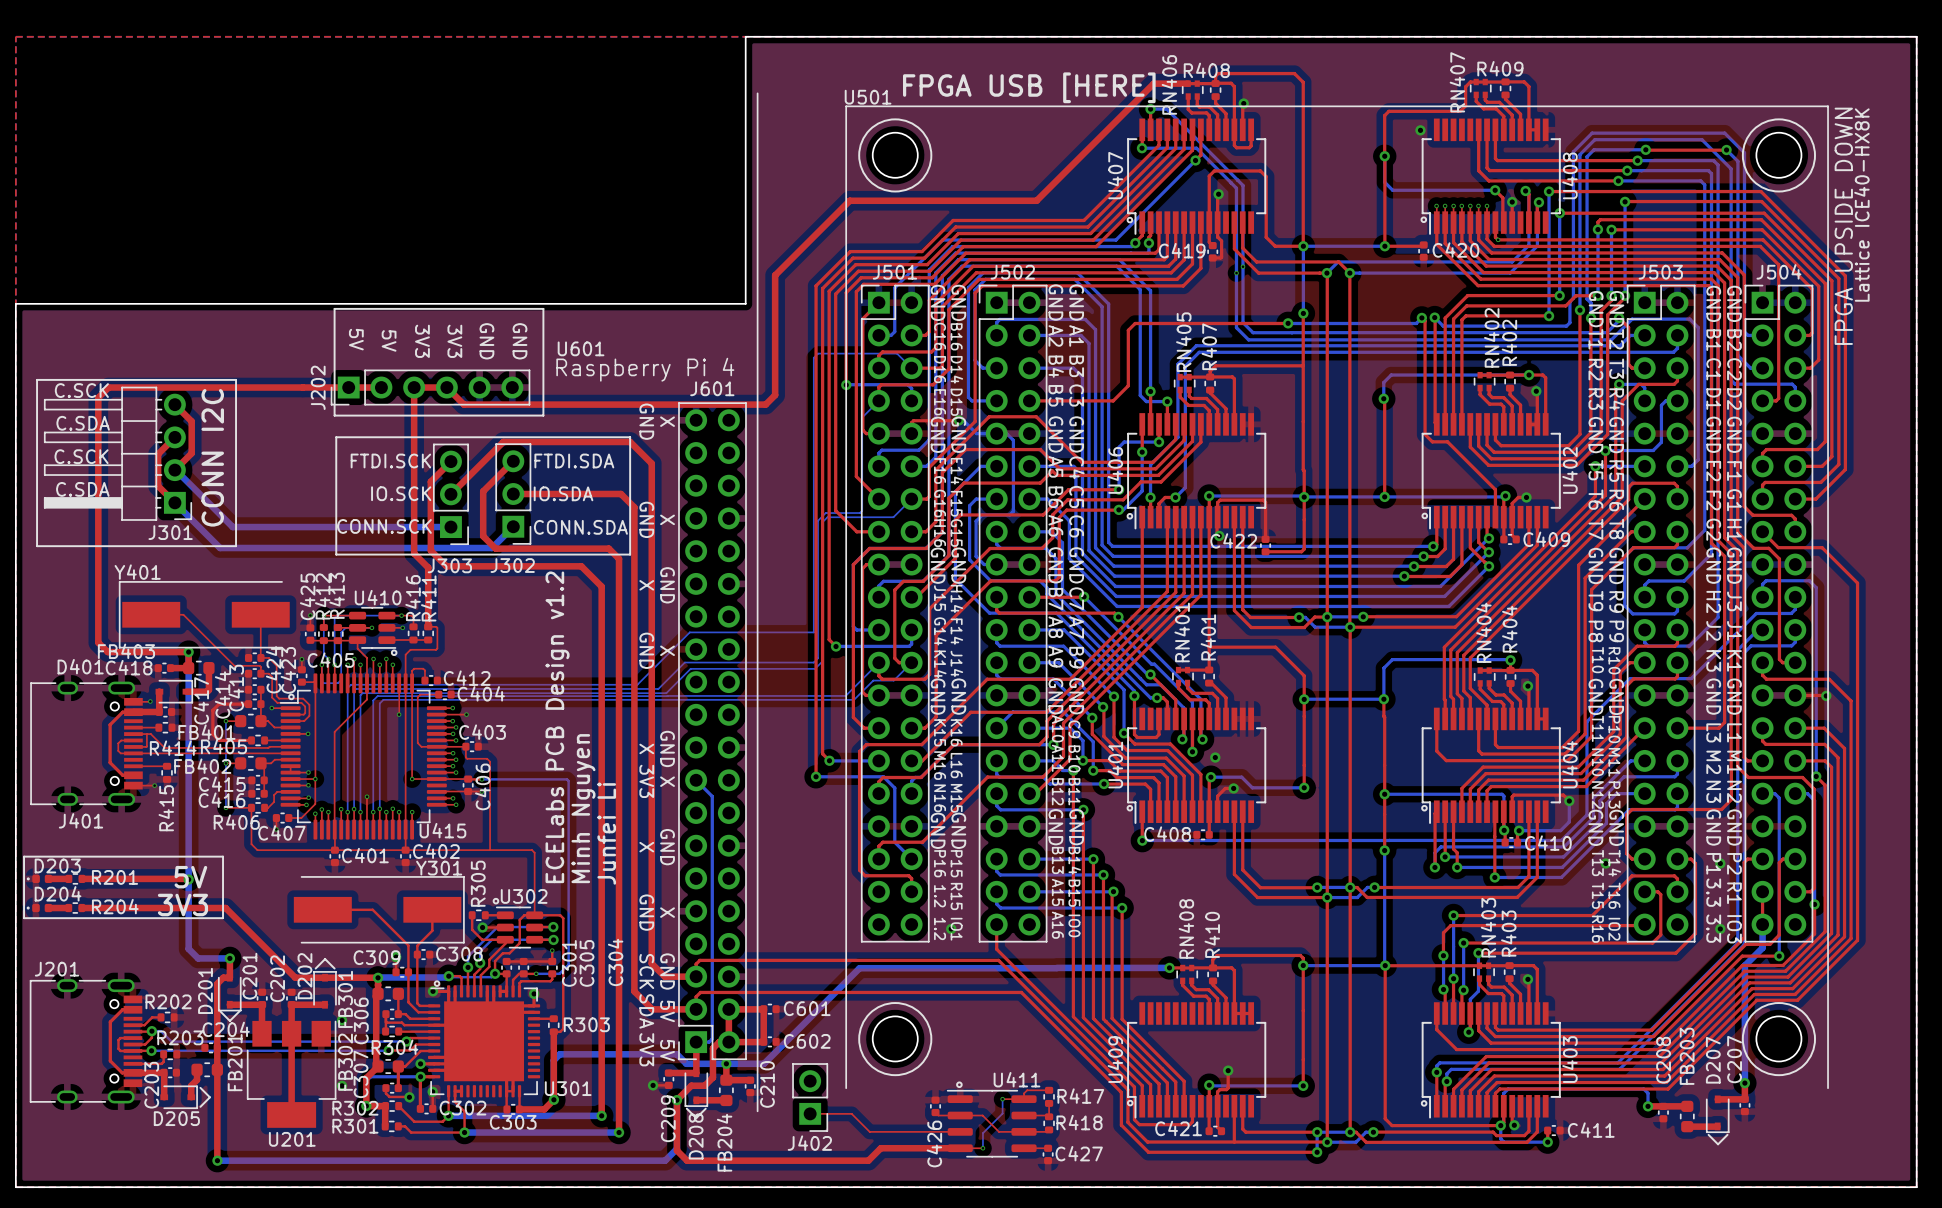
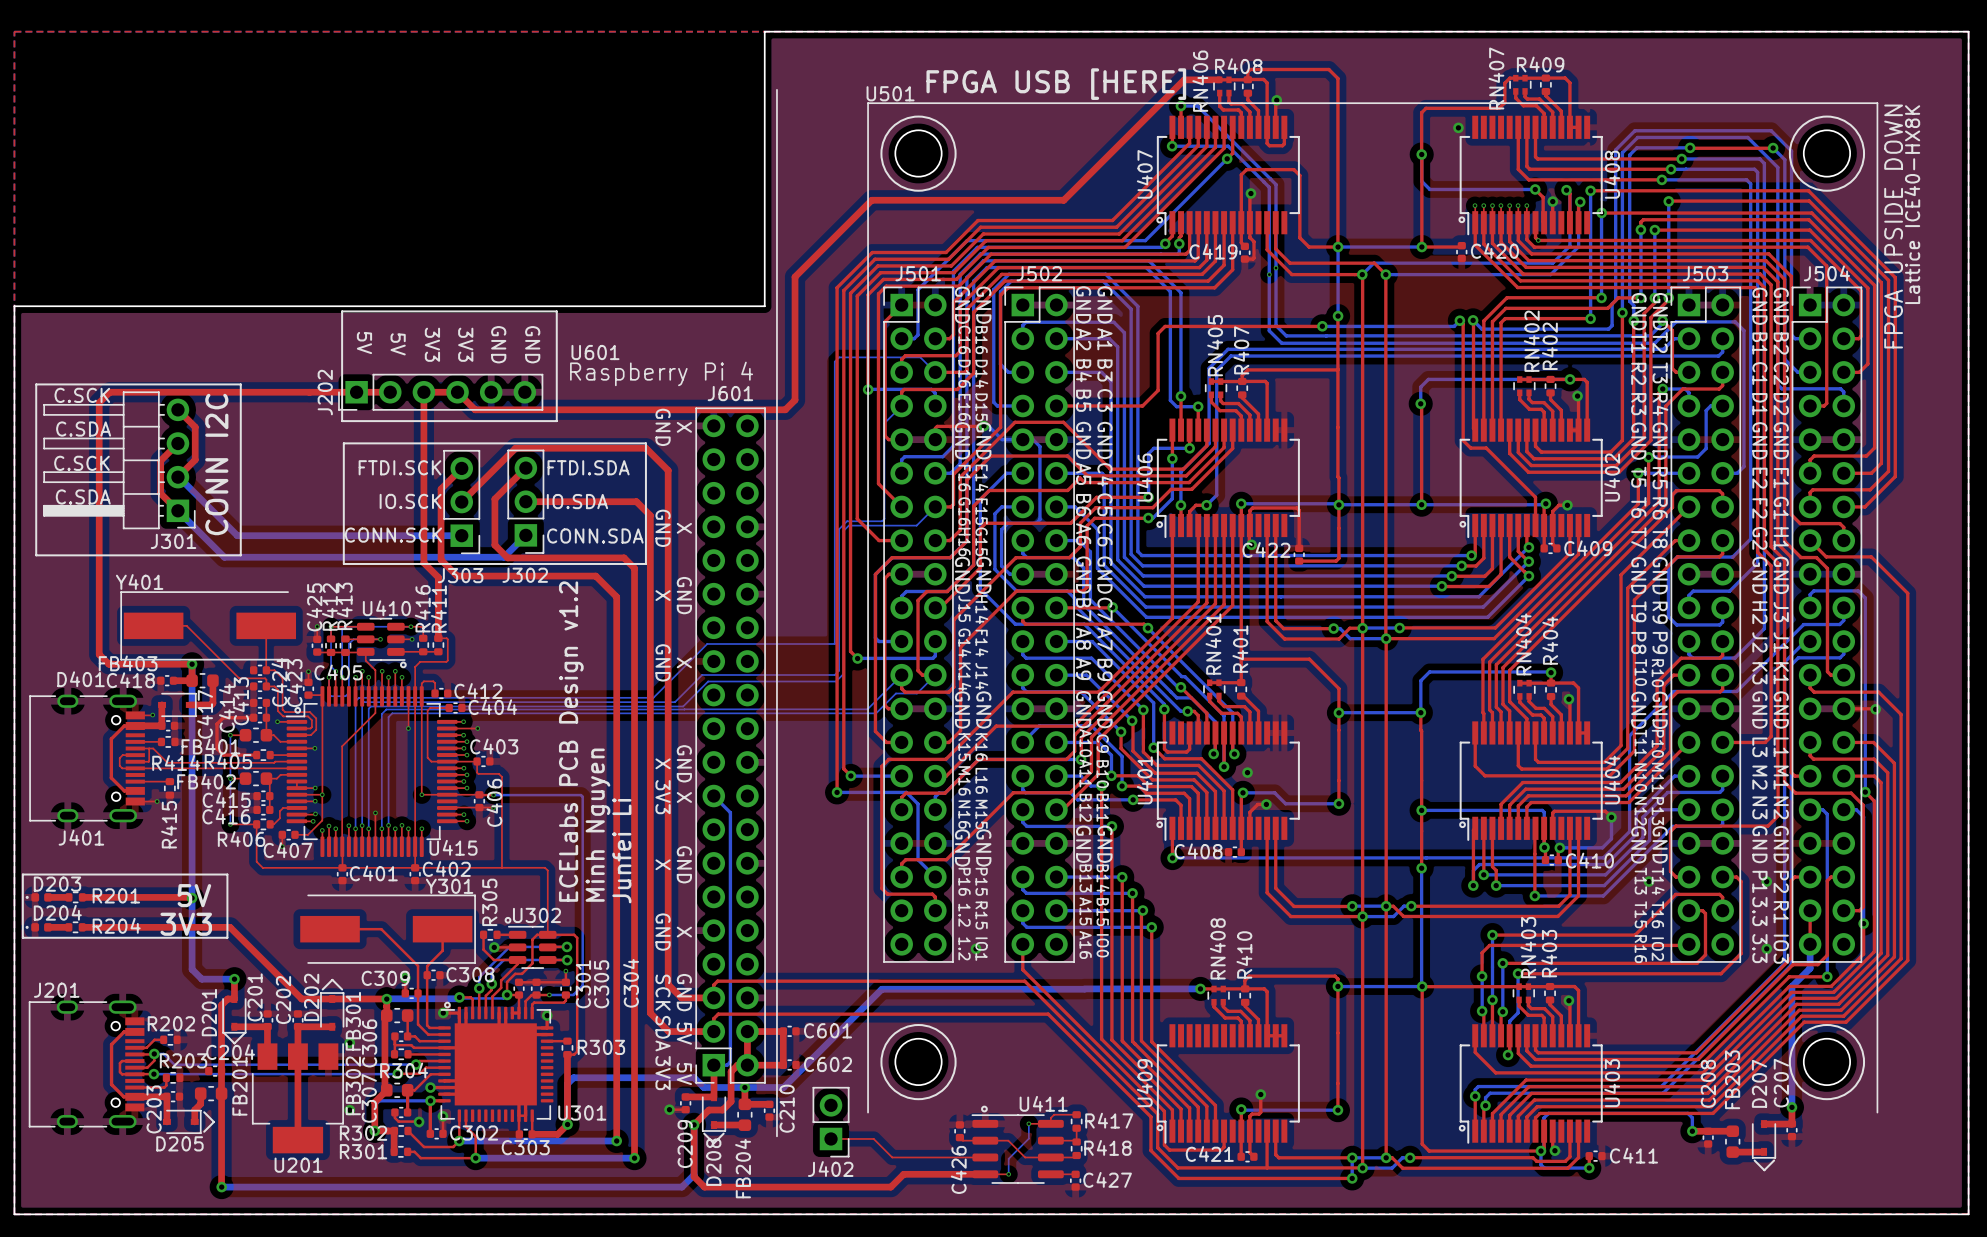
top track: (455, 1091) (461, 1091) -> none

